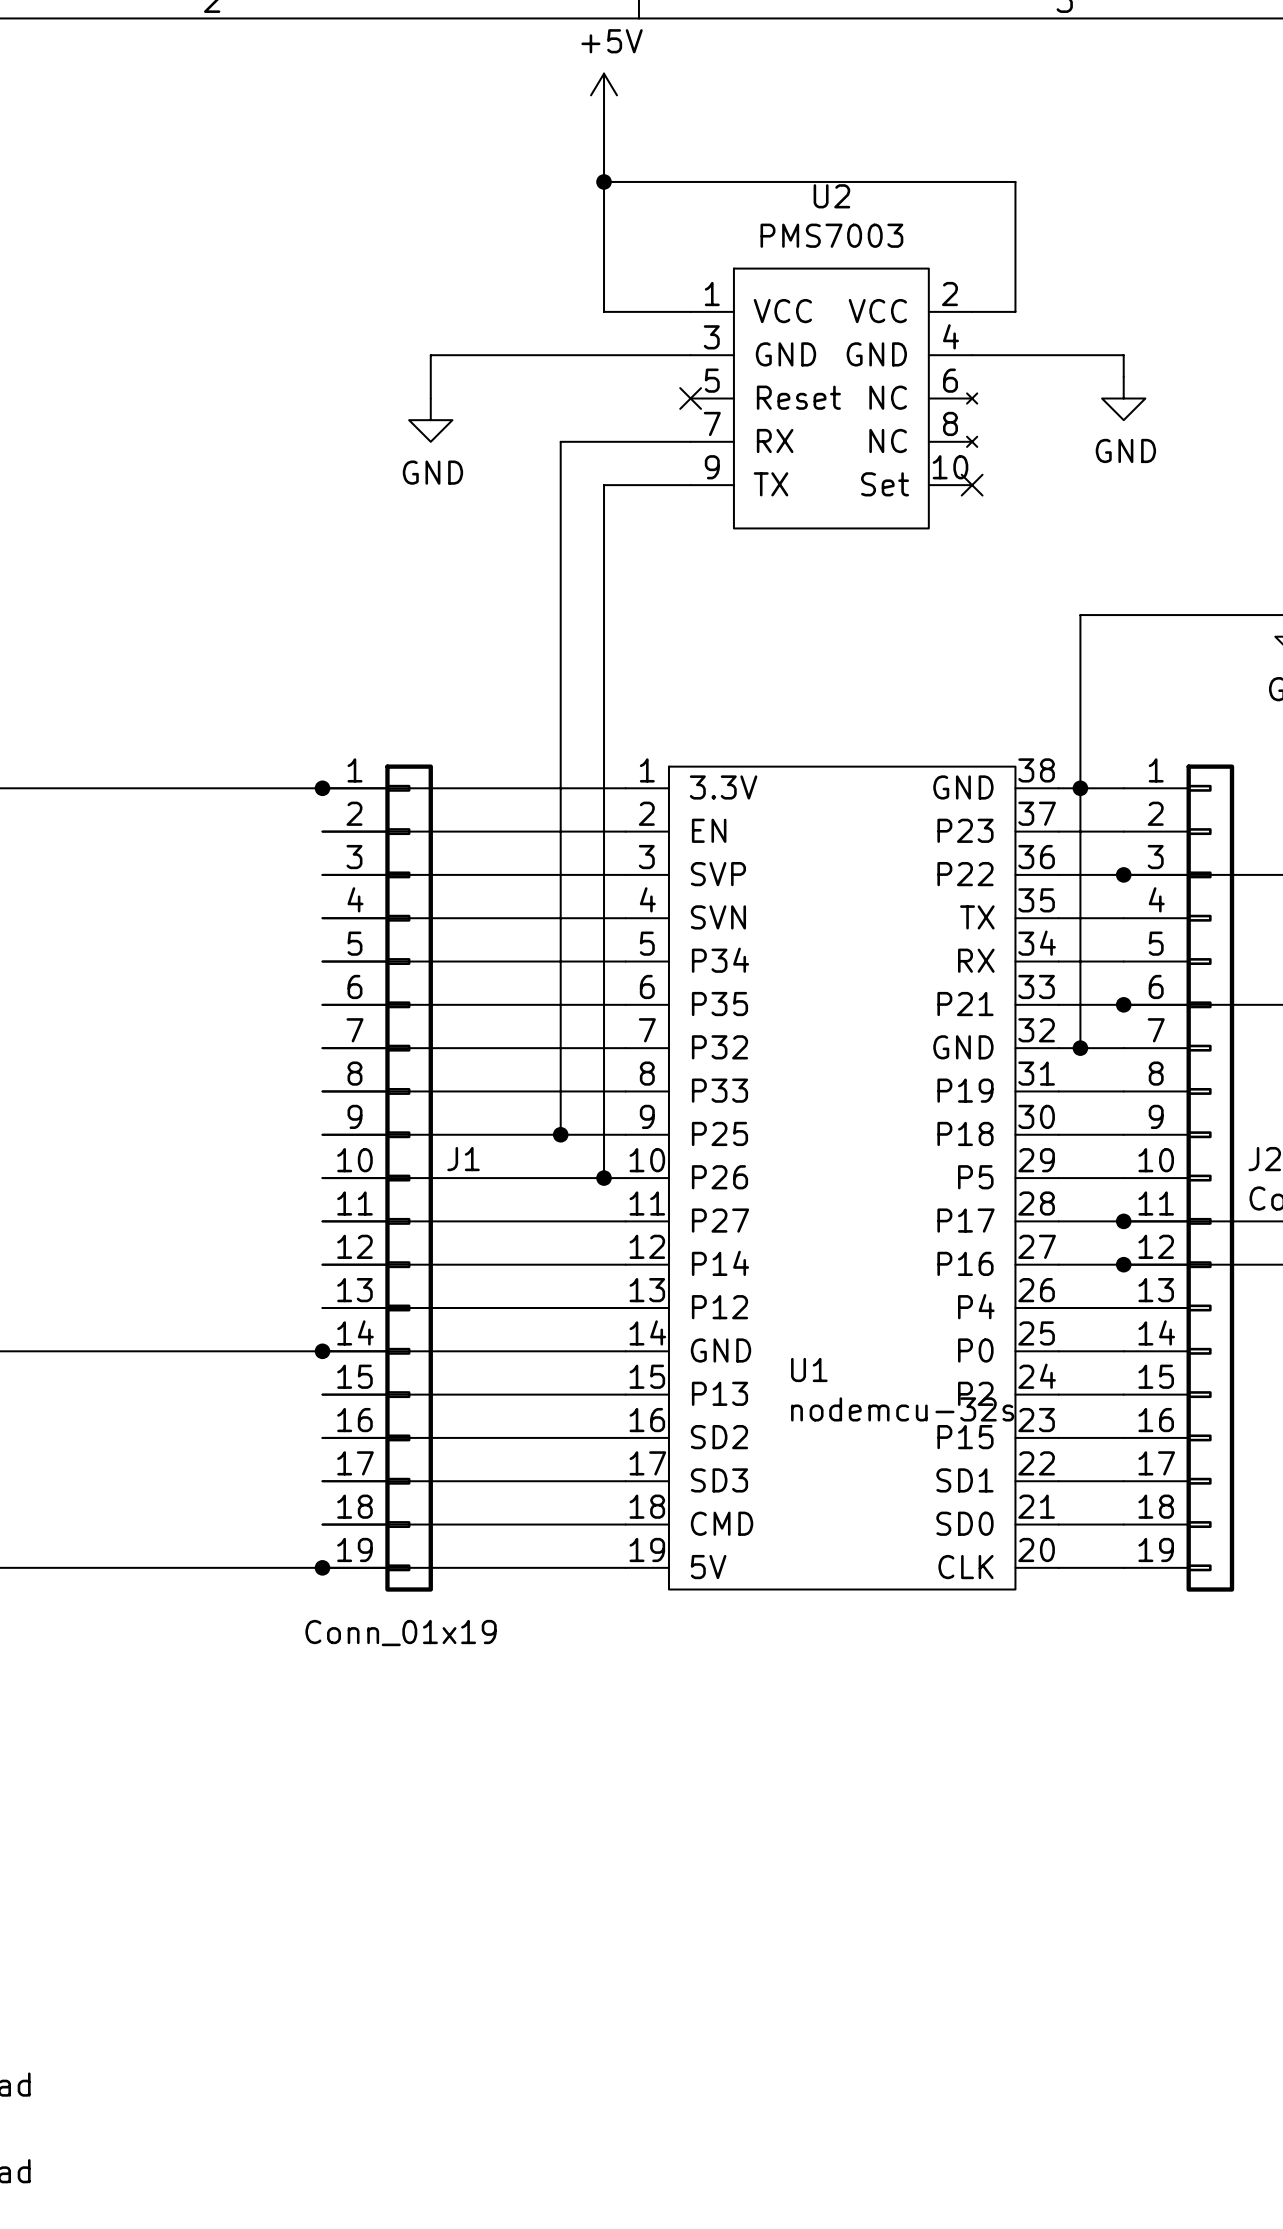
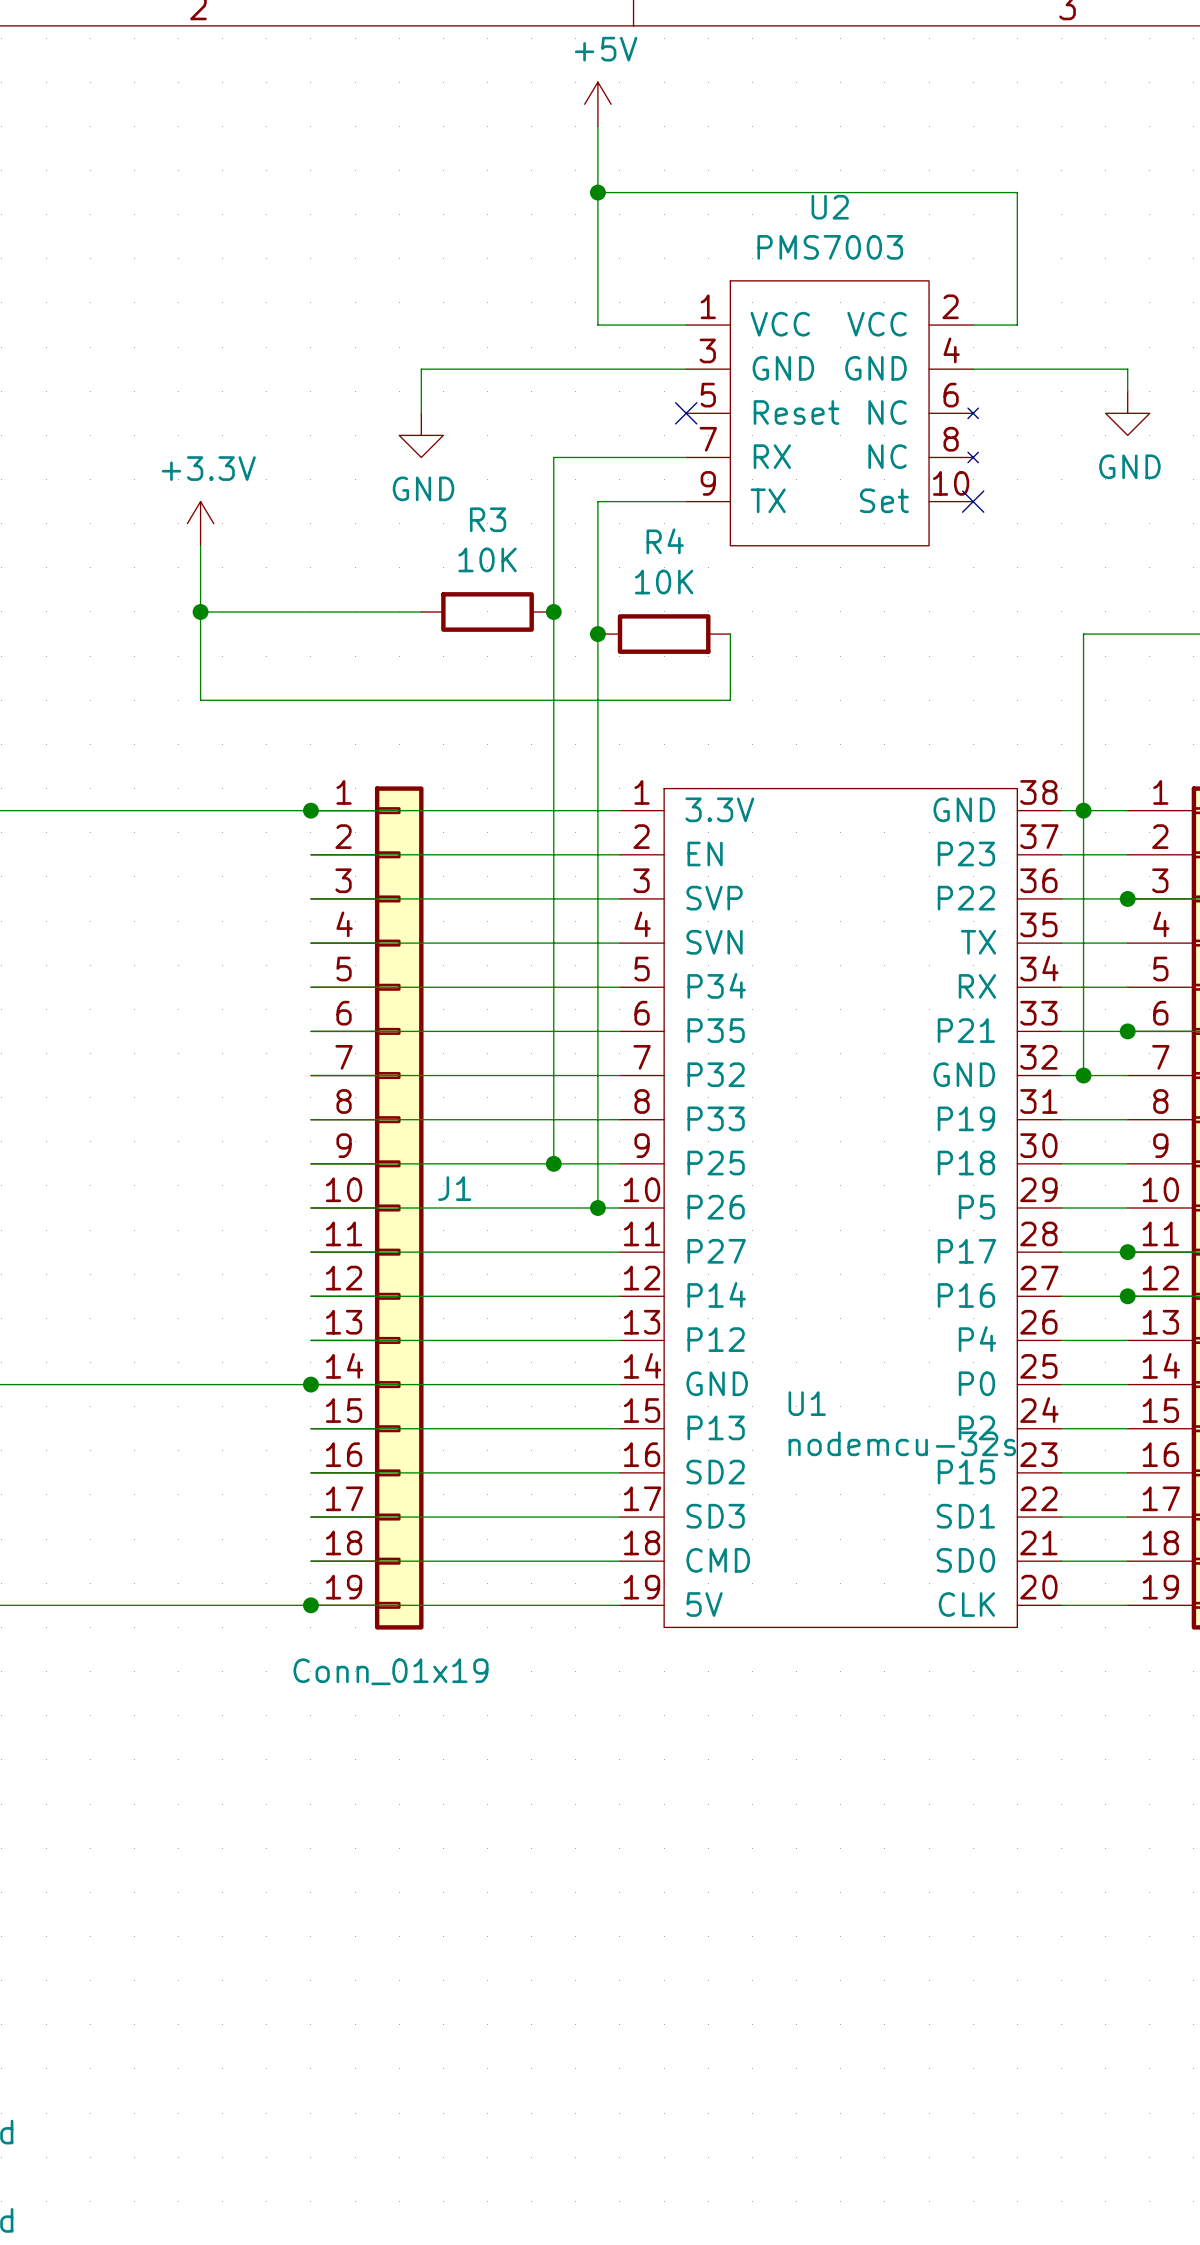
power symbol: none -> +3.3V (200, 523)
wire: none -> (200, 545) (200, 700) (730, 700) (730, 634)
wire: none -> (200, 611) (421, 611)
junction: none -> (200, 611)
R3: none -> 10K (487, 611)
junction: none -> (553, 611)
junction: none -> (597, 634)
R4: none -> 10K (664, 634)

